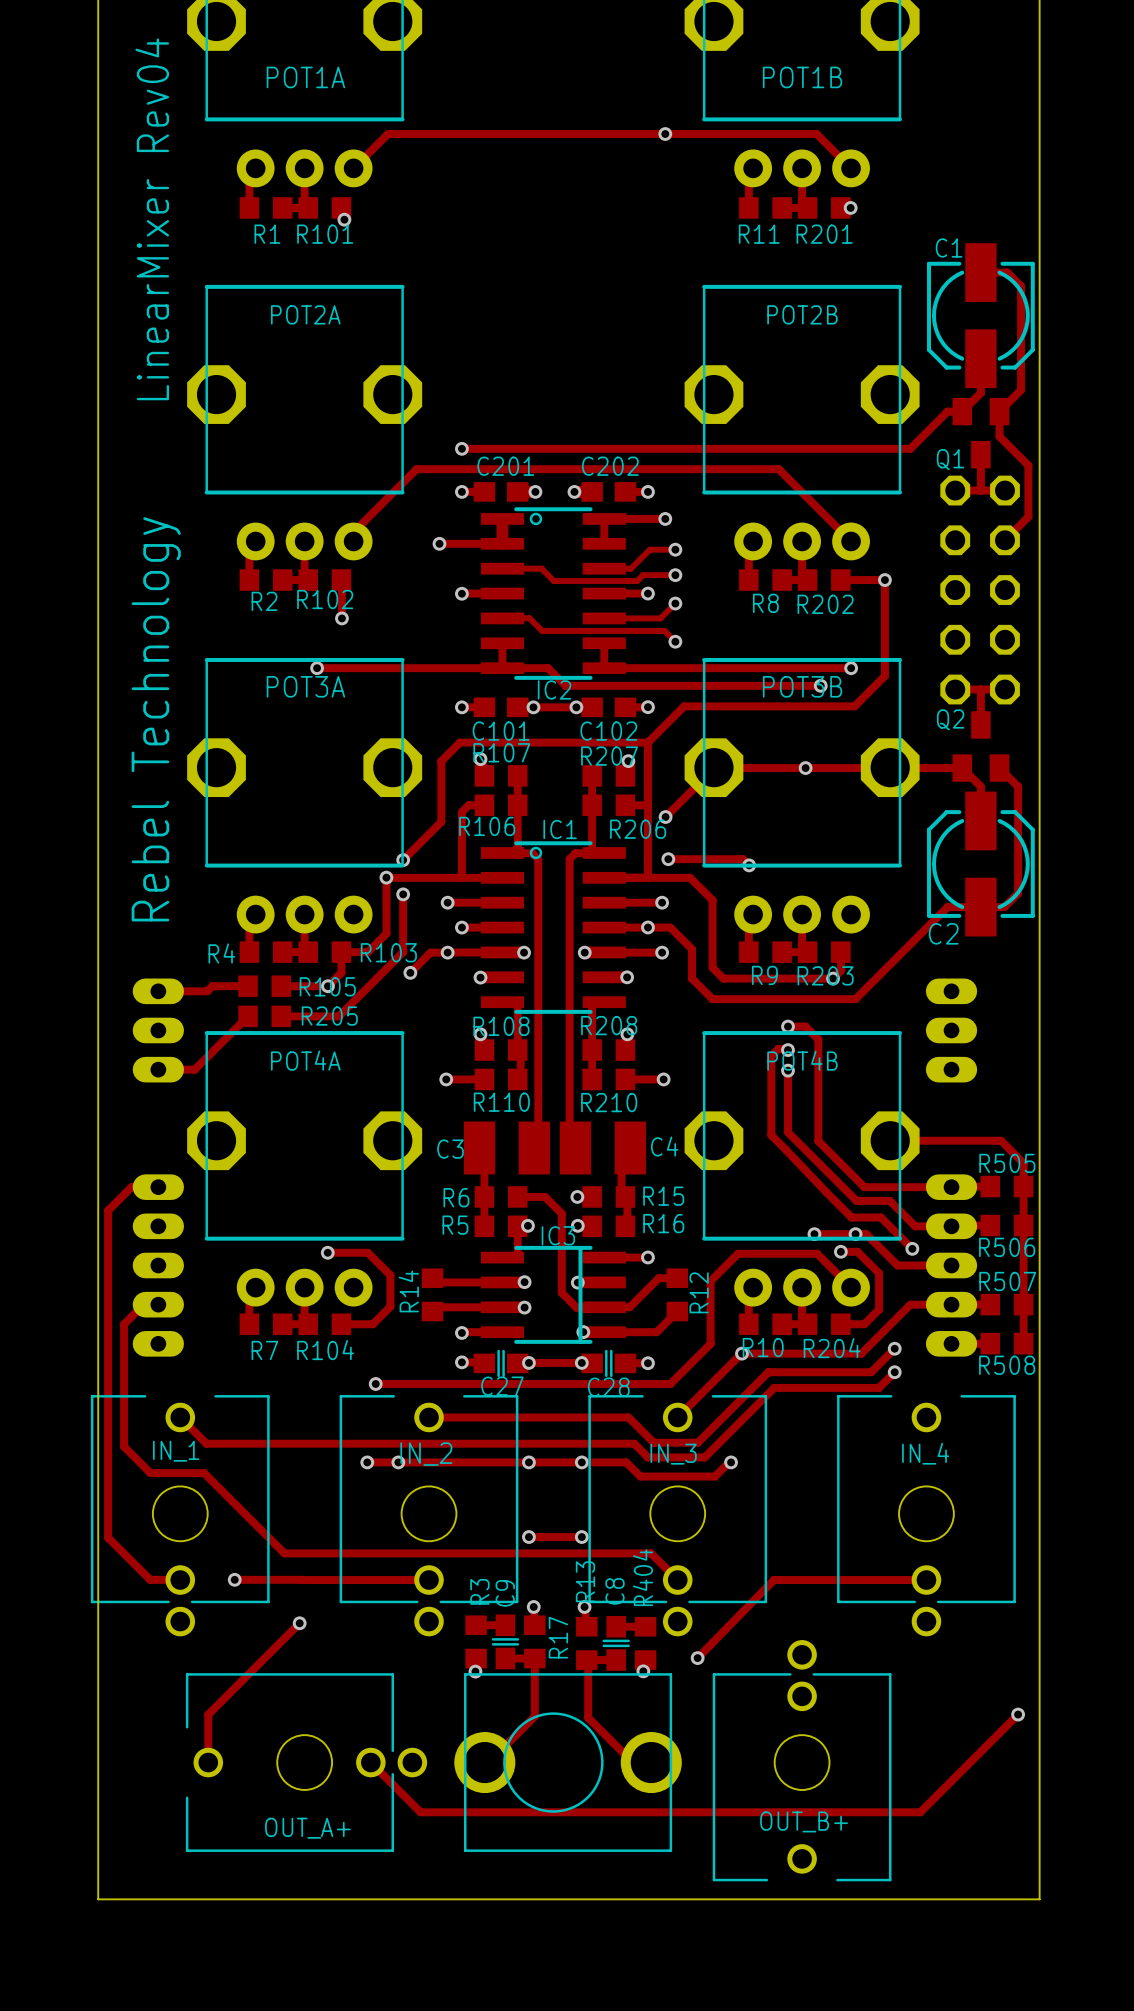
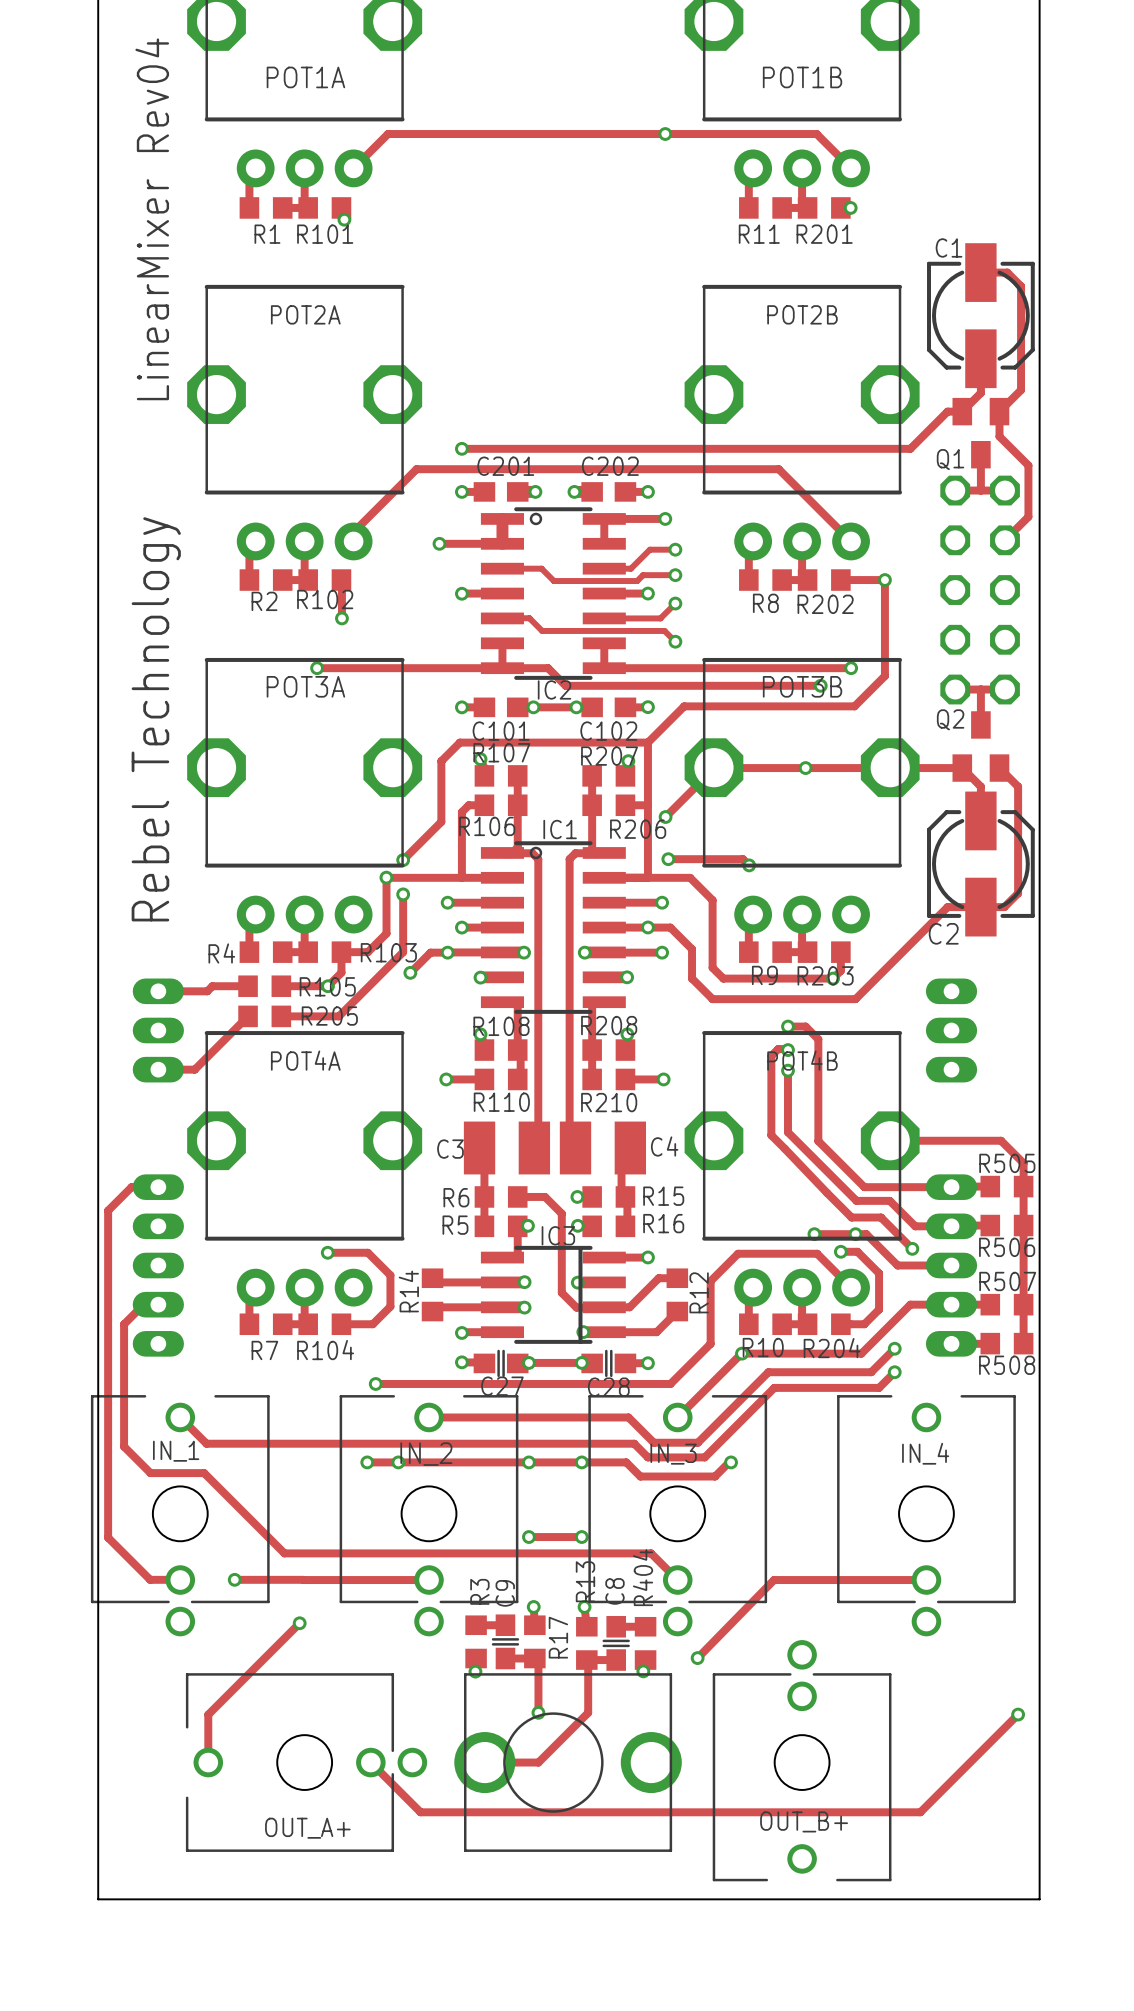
track: (534, 1658) (534, 1716) (488, 1762) -> (534, 1658) (538, 1662) (538, 1712)
via: none -> (538, 1712)
track: (588, 1712) (588, 1717) (632, 1762) (651, 1762) -> (588, 1712) (538, 1762) (488, 1762)

